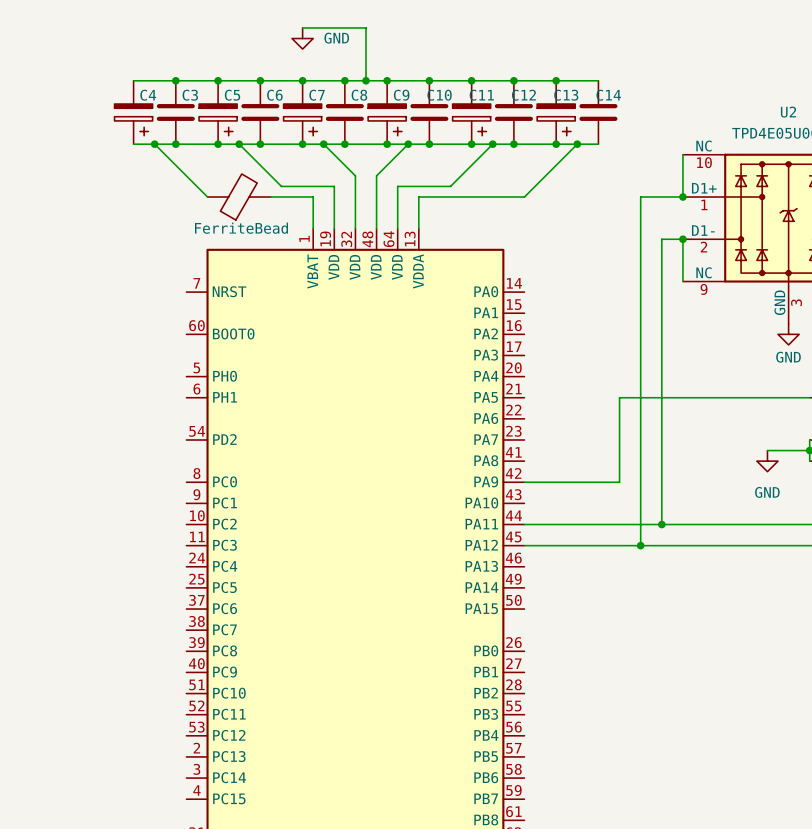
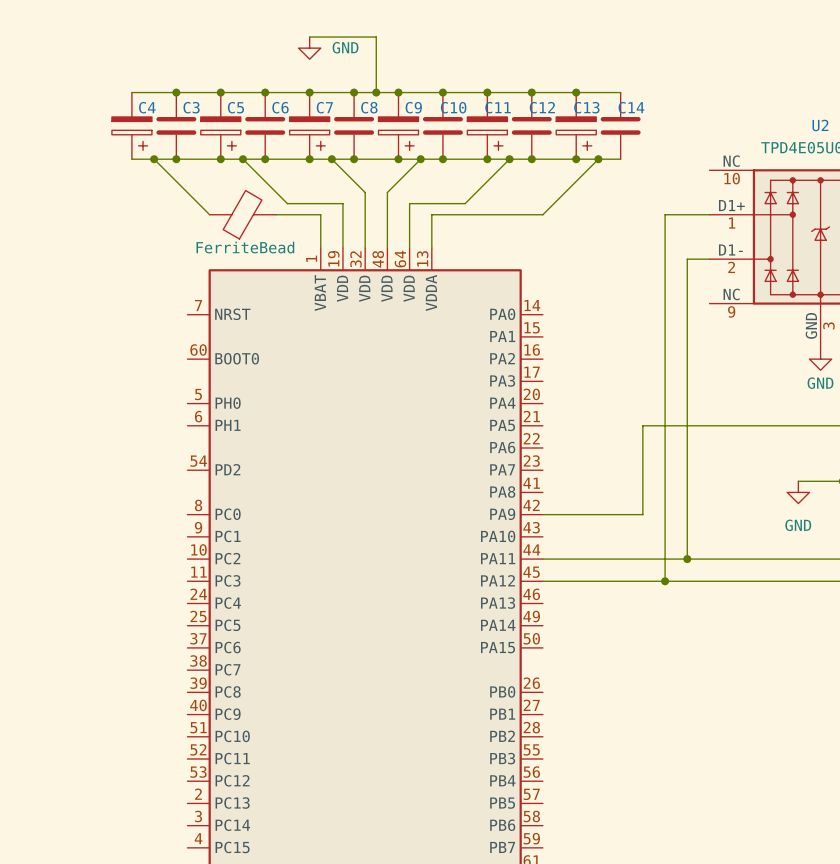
wire: (682, 154) (682, 197) -> none
junction: (682, 197) -> none
wire: (682, 239) (682, 281) -> none
junction: (682, 239) -> none

